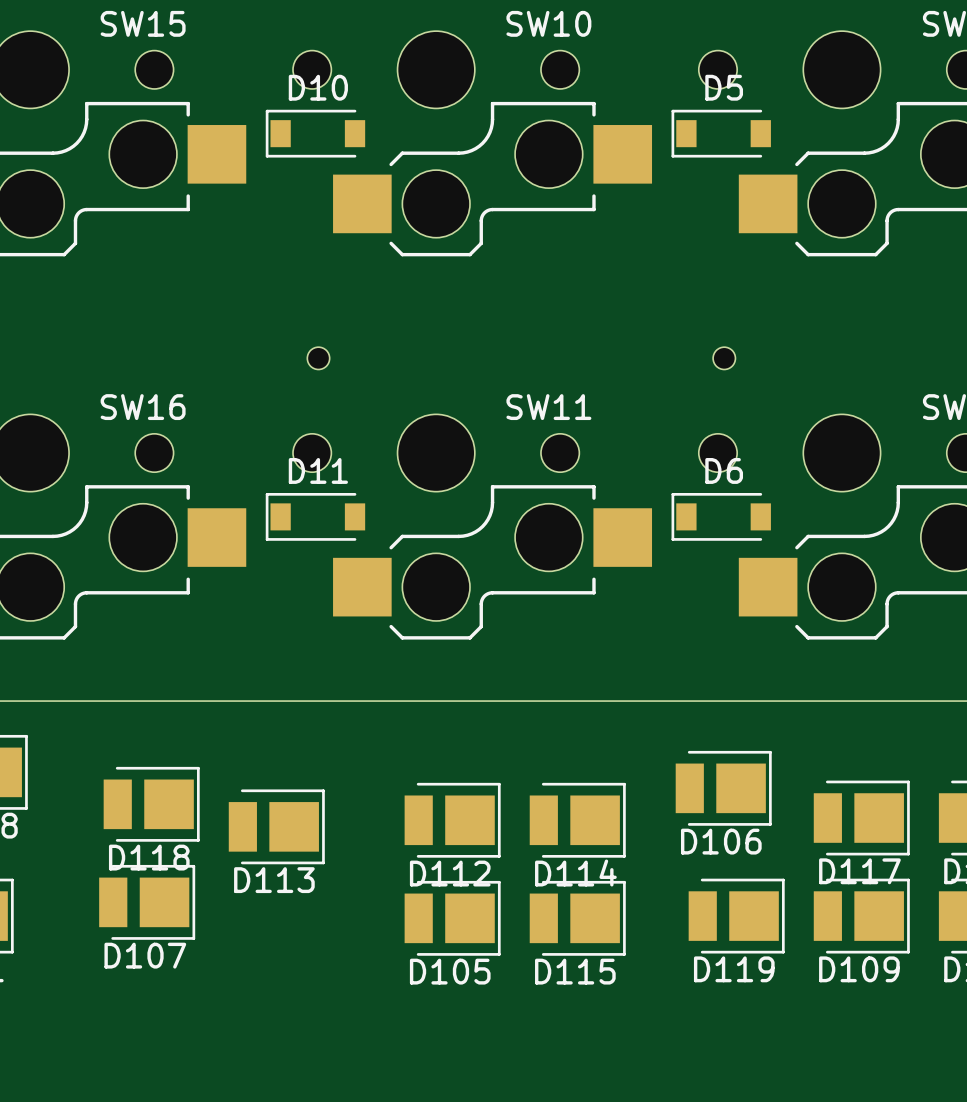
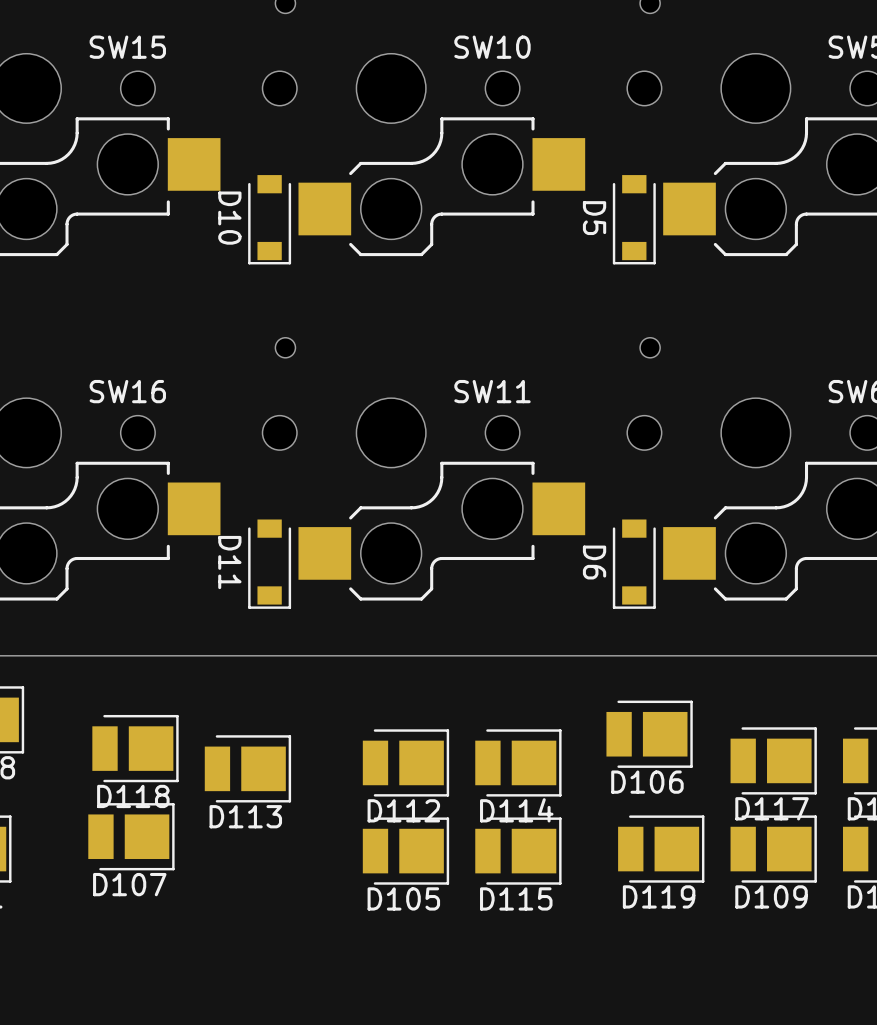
D10 rotation: 0° (315, 133) -> 90° counterclockwise (269, 219)
D10 position: (315, 133) -> (269, 219)
D5 rotation: 0° (721, 133) -> 90° counterclockwise (634, 219)
D5 position: (721, 133) -> (634, 219)
D11 rotation: 0° (315, 516) -> 90° counterclockwise (269, 564)
D11 position: (315, 516) -> (269, 564)
D6 rotation: 0° (721, 516) -> 90° counterclockwise (634, 564)
D6 position: (721, 516) -> (634, 564)

